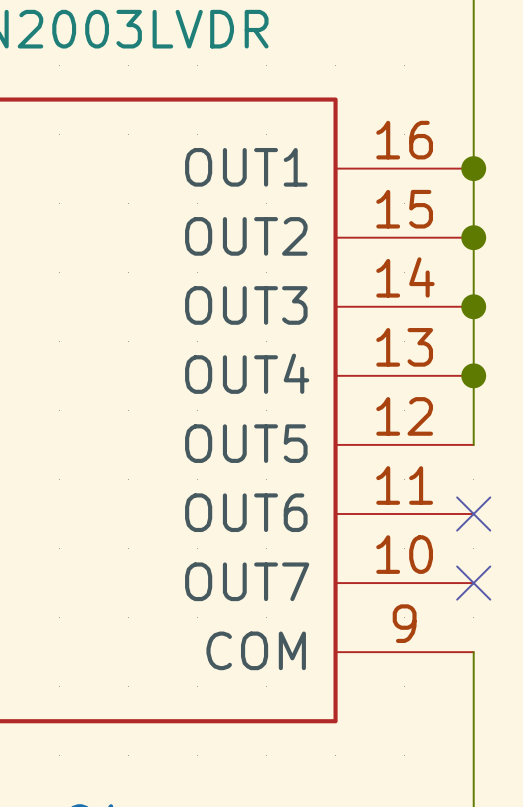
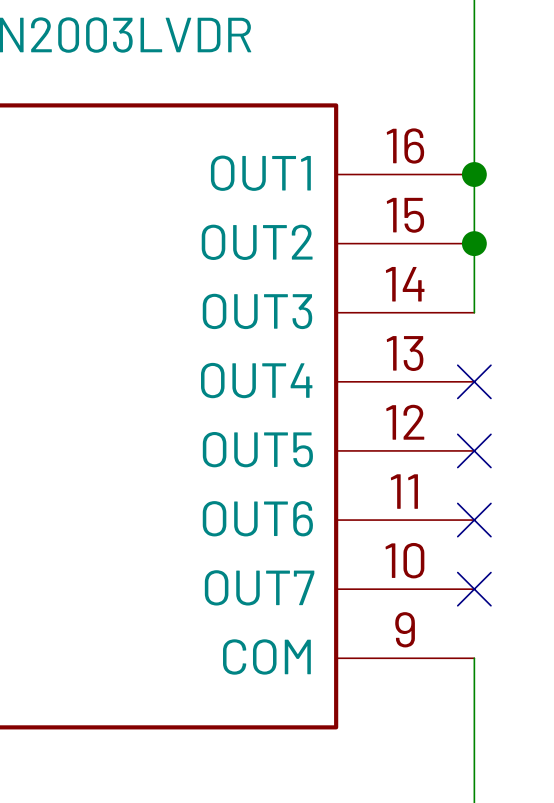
wire: (473, 306) (473, 444) -> none
junction: (473, 306) -> none
junction: (473, 375) -> none
no-connect mark: none -> (474, 381)
no-connect mark: none -> (474, 450)

